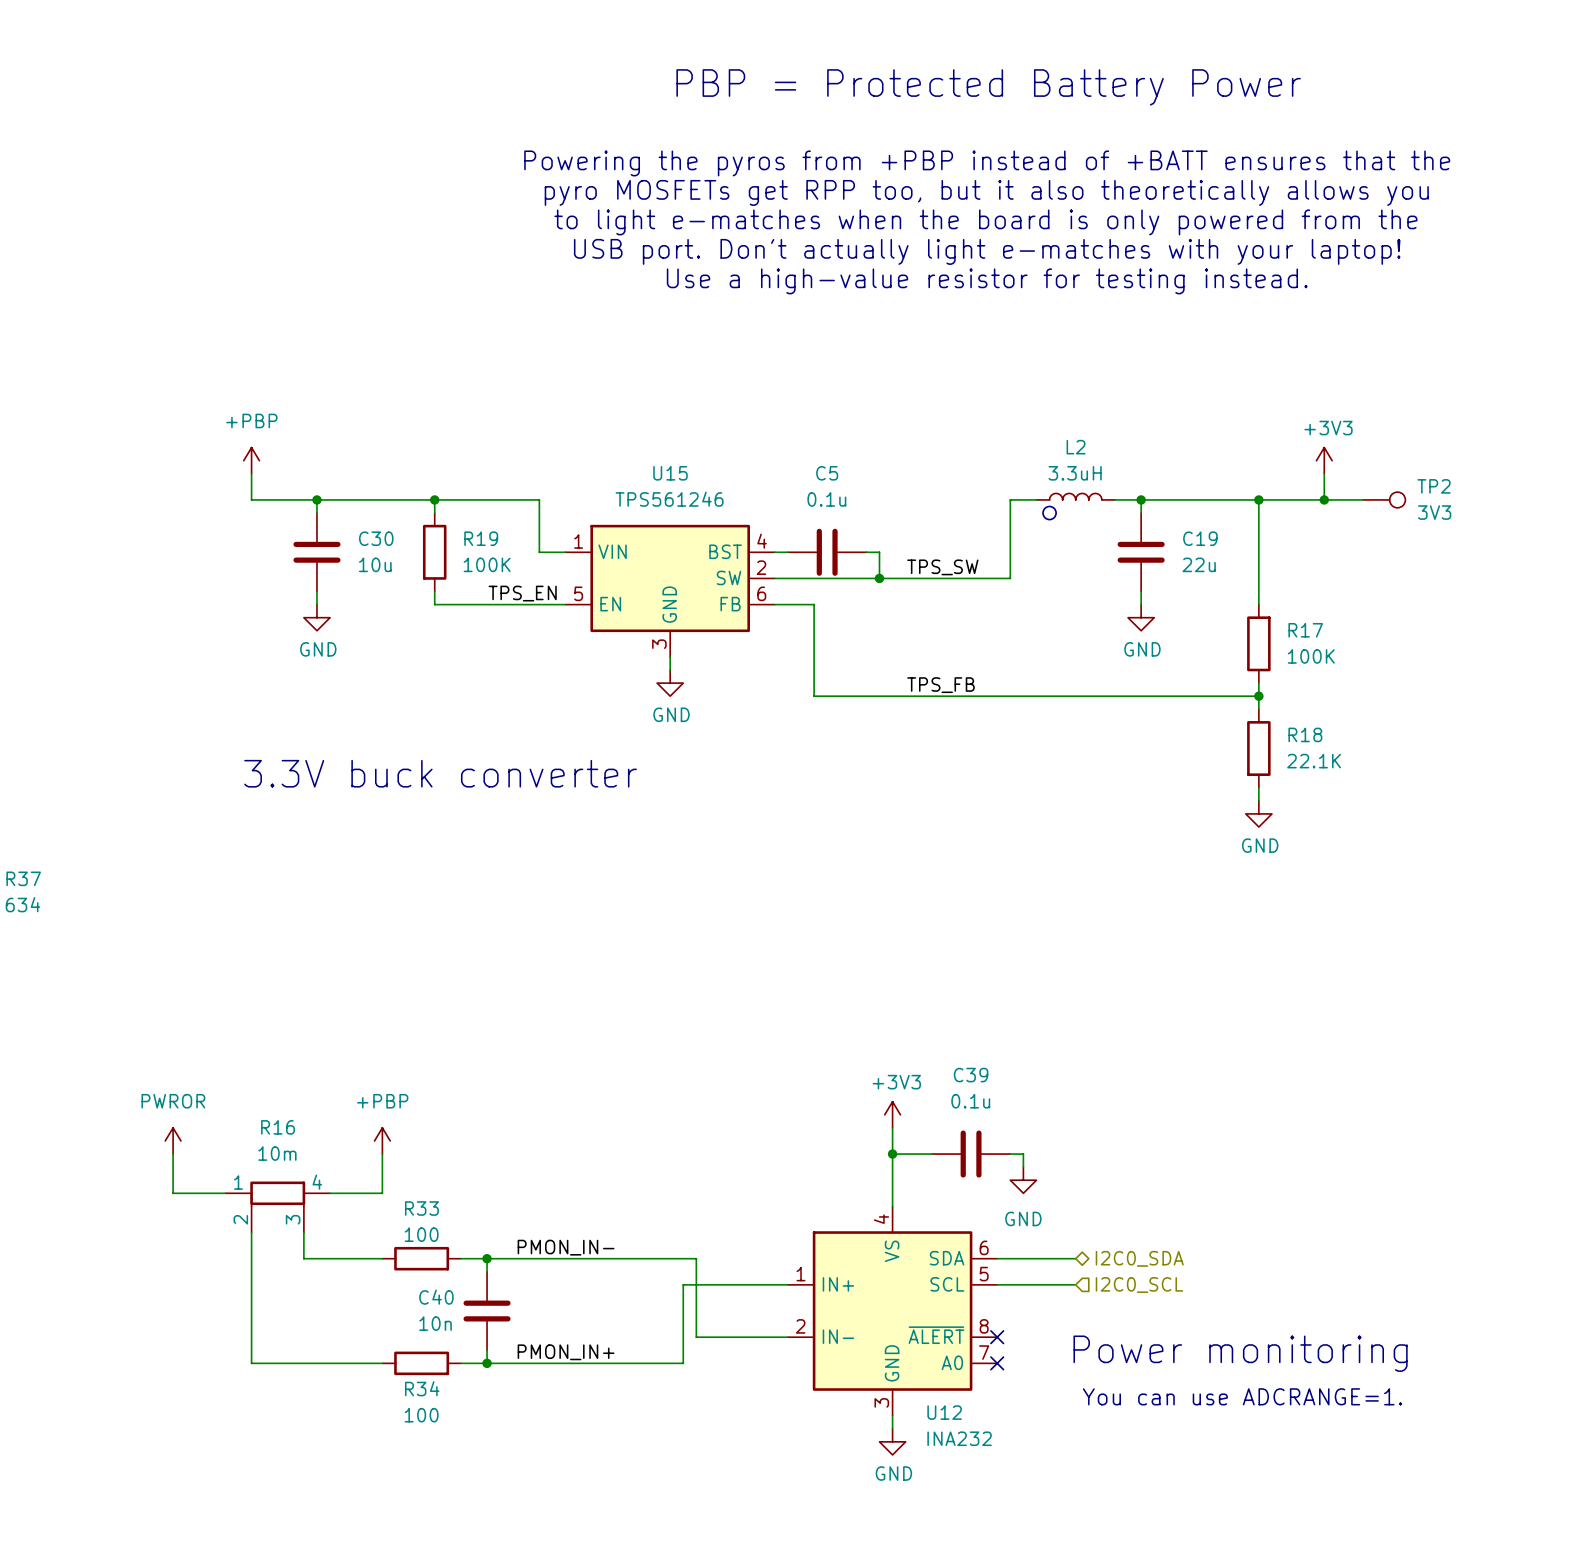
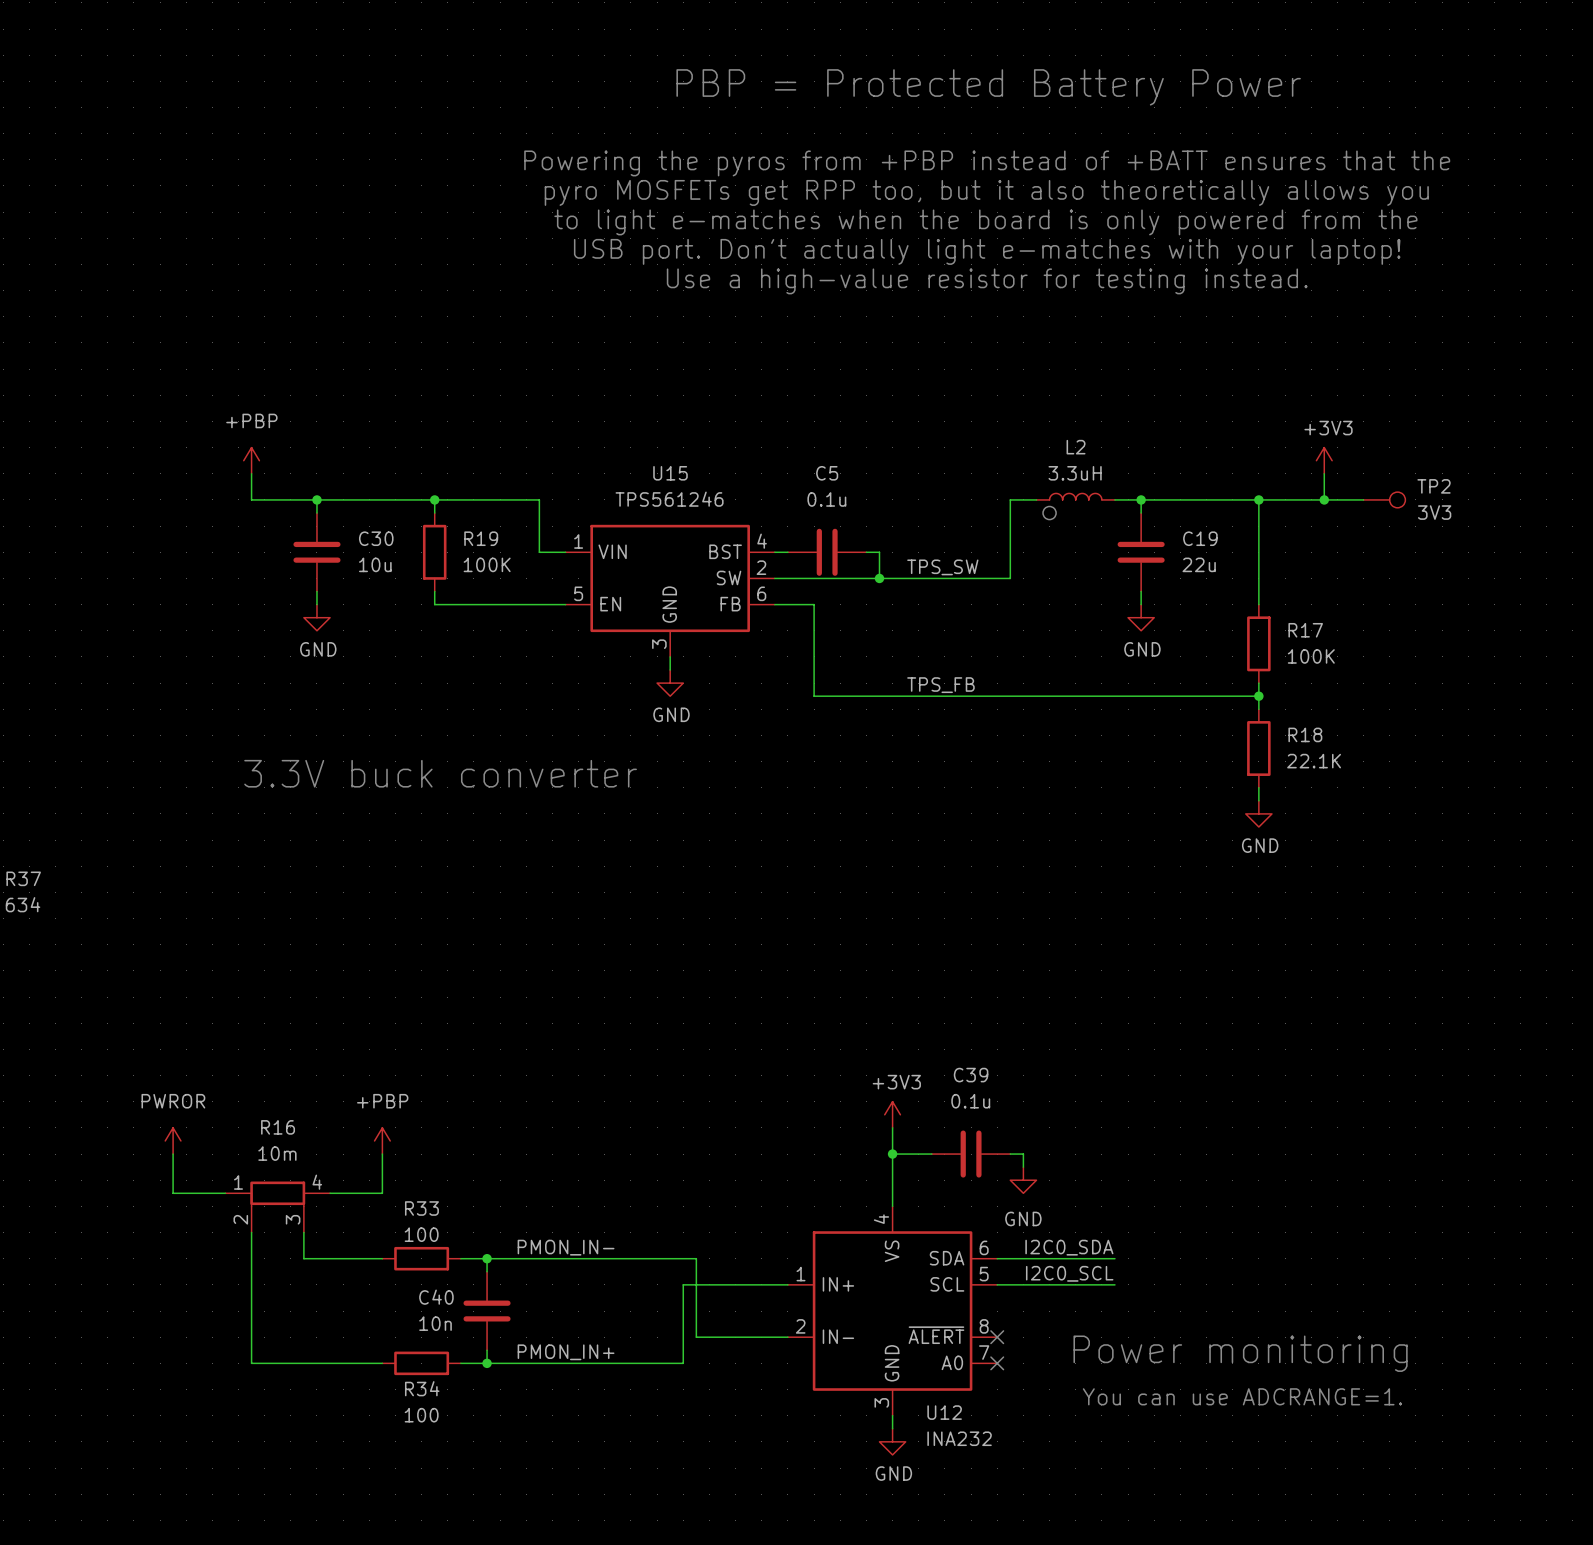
label: TPS_EN (522, 593) -> none
label: none -> I2C0_SDA (1069, 1247)
wire: none -> (1075, 1258) (1114, 1258)
hierarchical label: I2C0_SDA (1139, 1258) -> none
label: none -> I2C0_SCL (1069, 1273)
wire: none -> (1075, 1284) (1114, 1284)
hierarchical label: I2C0_SCL (1139, 1285) -> none

